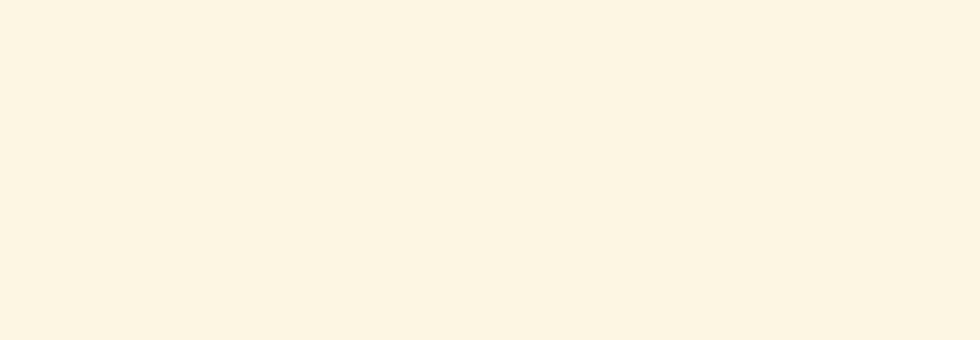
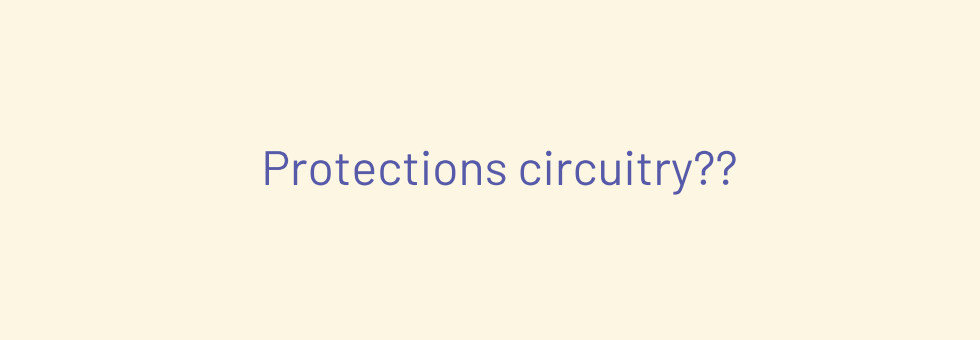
text: none -> Protections circuitry?? (500, 172)

